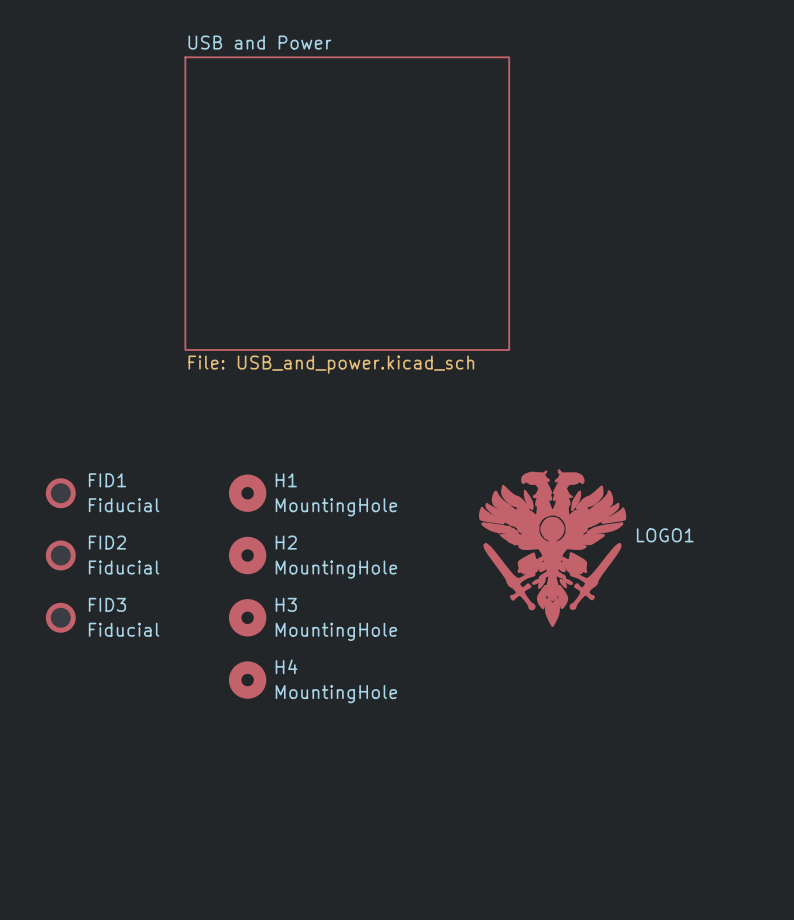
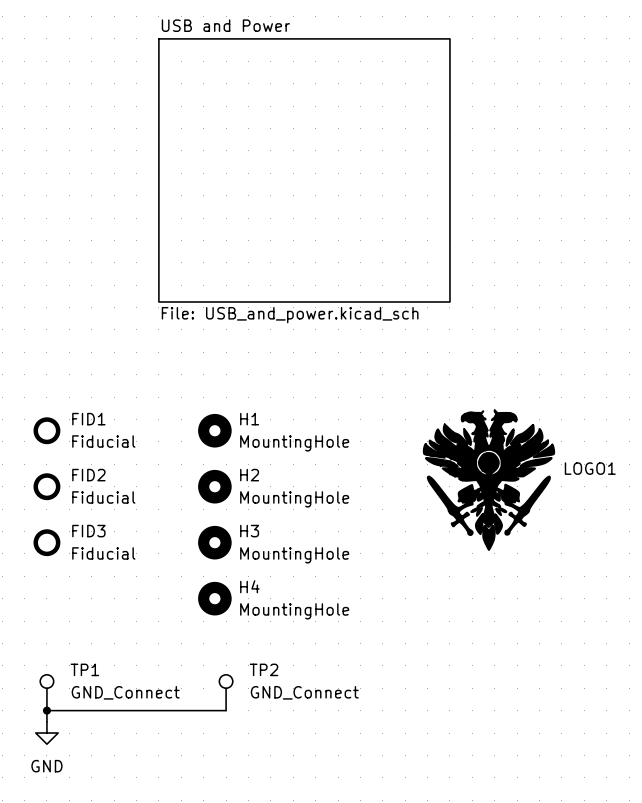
TP1: none -> GND_Connect (46, 692)
TP2: none -> GND_Connect (226, 692)
junction: none -> (46, 710)
wire: none -> (226, 710) (46, 710) (46, 721)
power symbol: none -> GND (46, 733)

